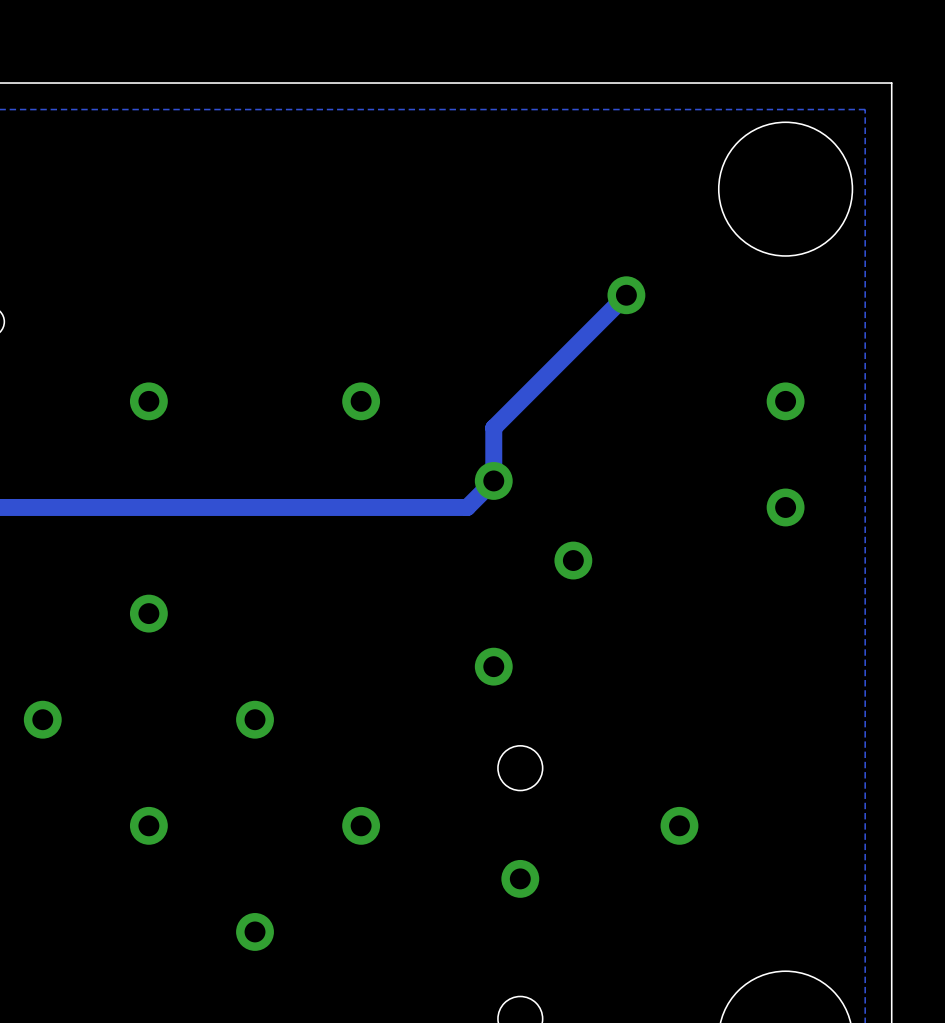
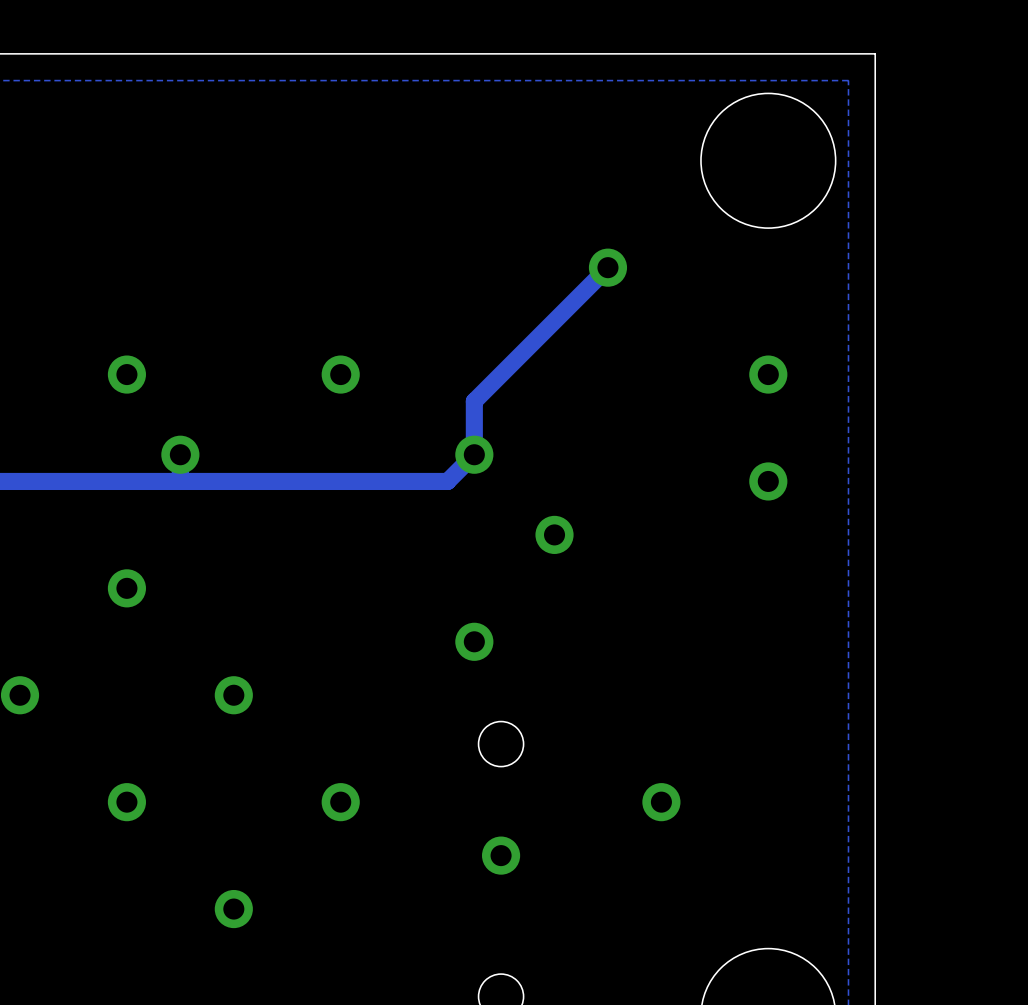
via: none -> (180, 454)

